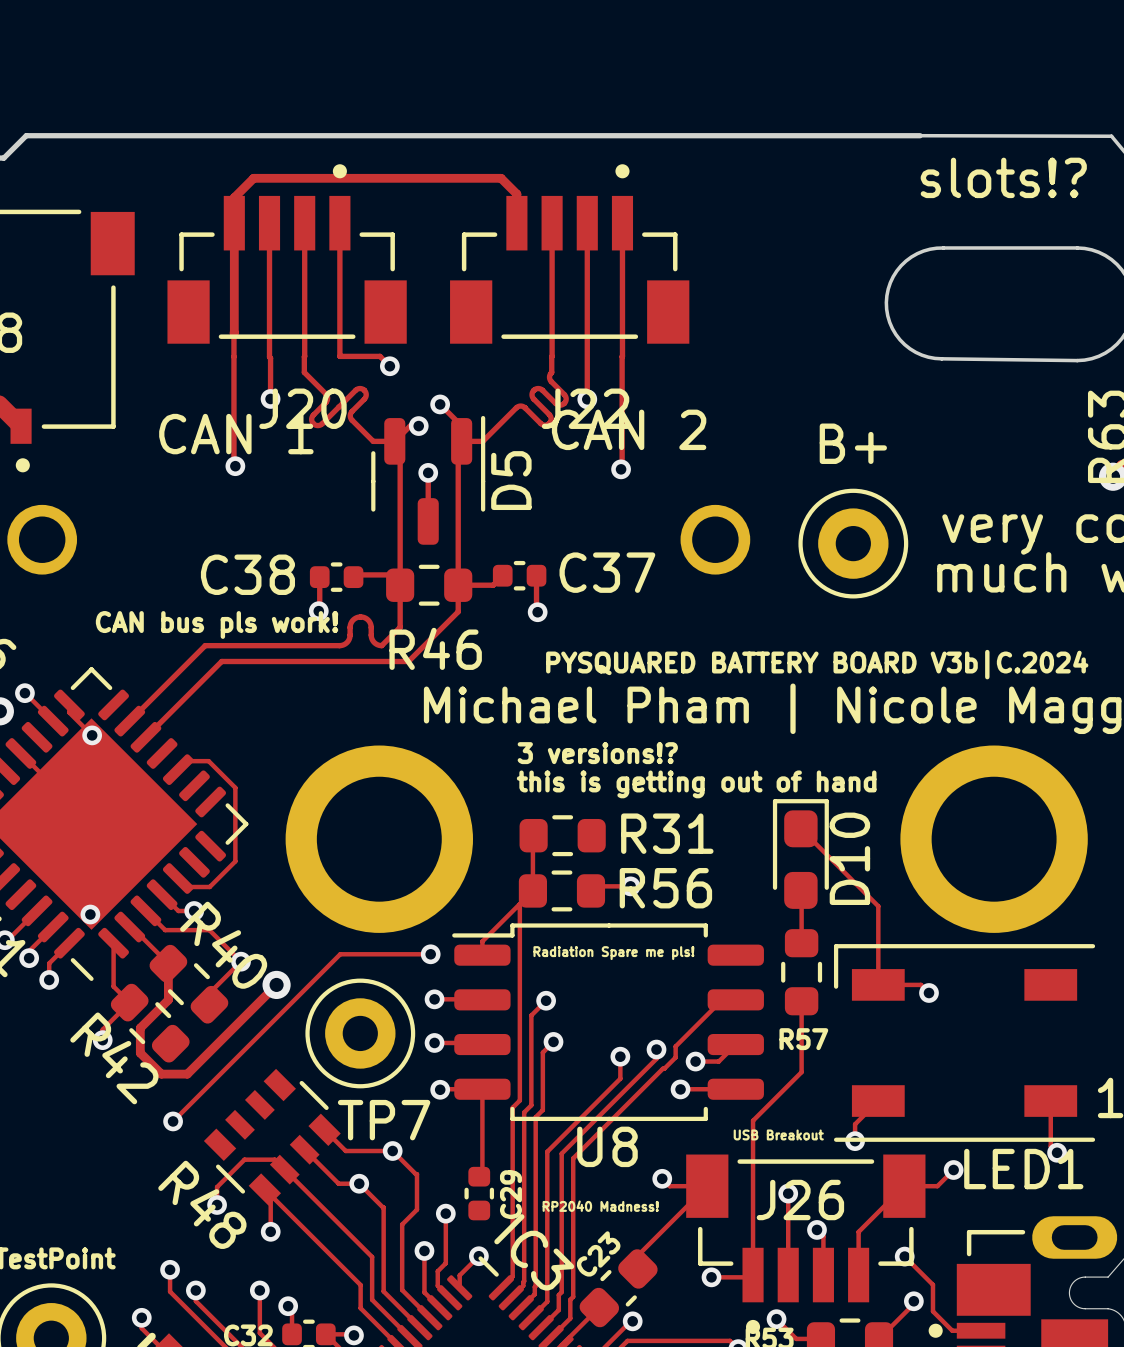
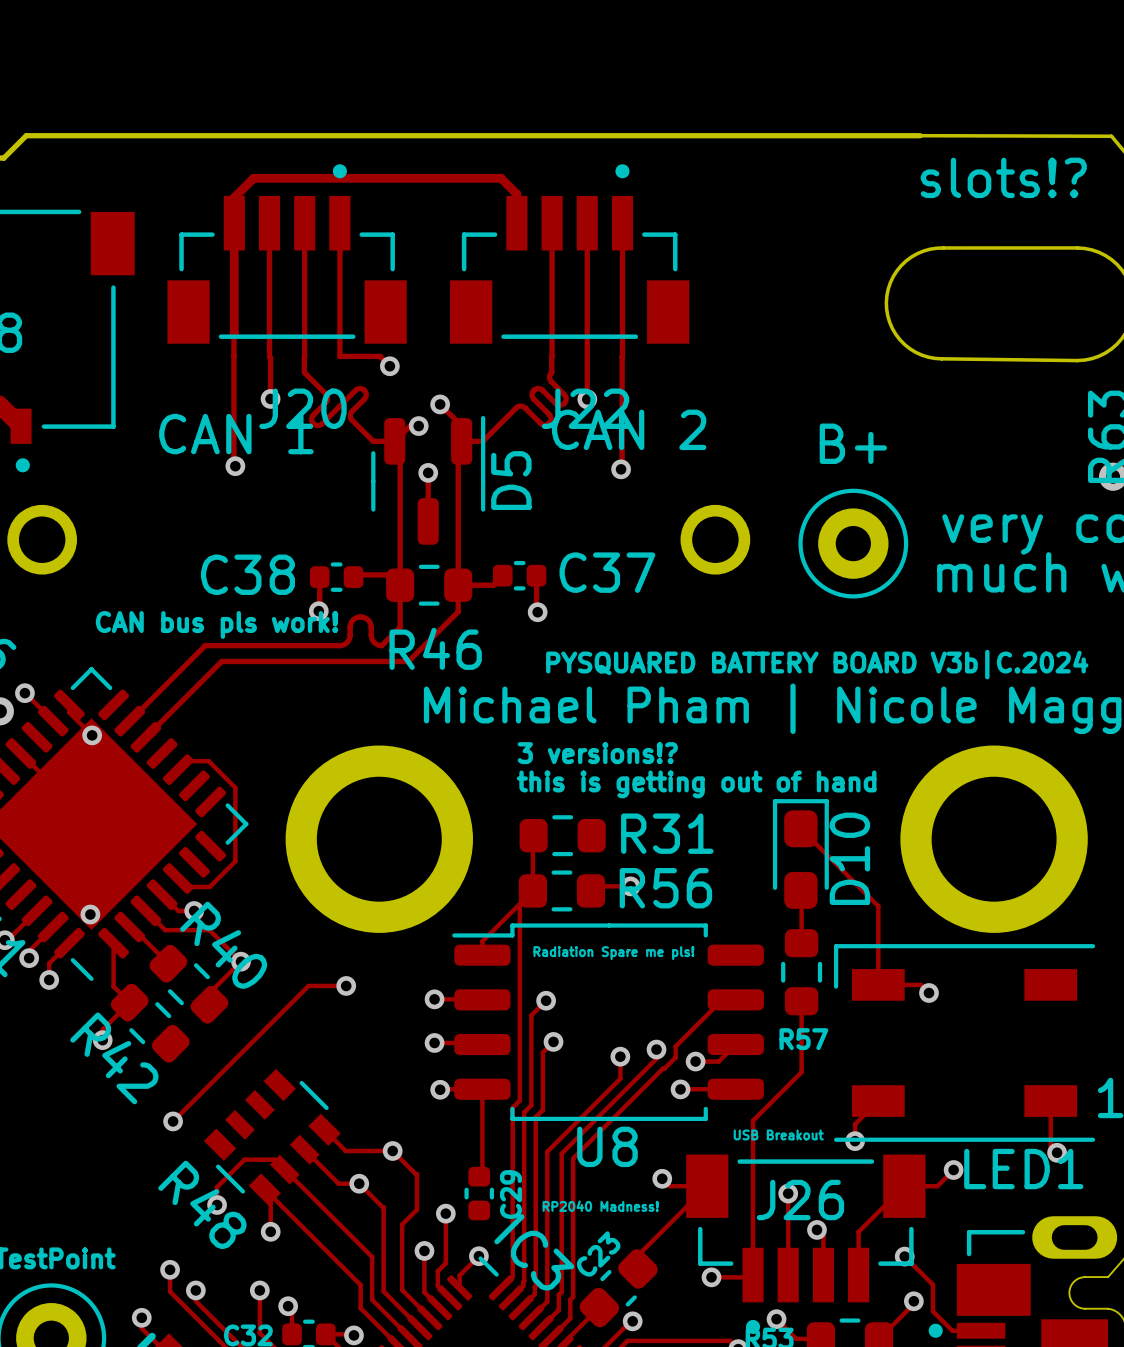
track: (430, 954) (340, 954) (308, 985) -> (346, 985) (308, 985)
via position: (430, 954) -> (346, 985)
track: (168, 963) (168, 1000) (140, 1028) (140, 1053) (161, 1074) (187, 1074) (276, 984) -> none
via: (276, 984) -> none
TP7: (360, 1033) -> none

